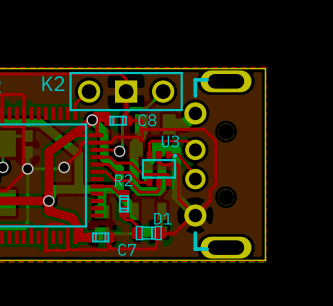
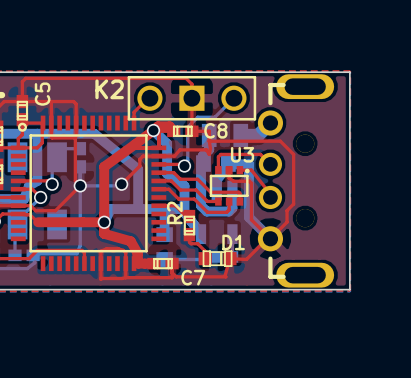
R2 name rotation: 0° (123, 180) -> 90° counterclockwise (174, 212)

